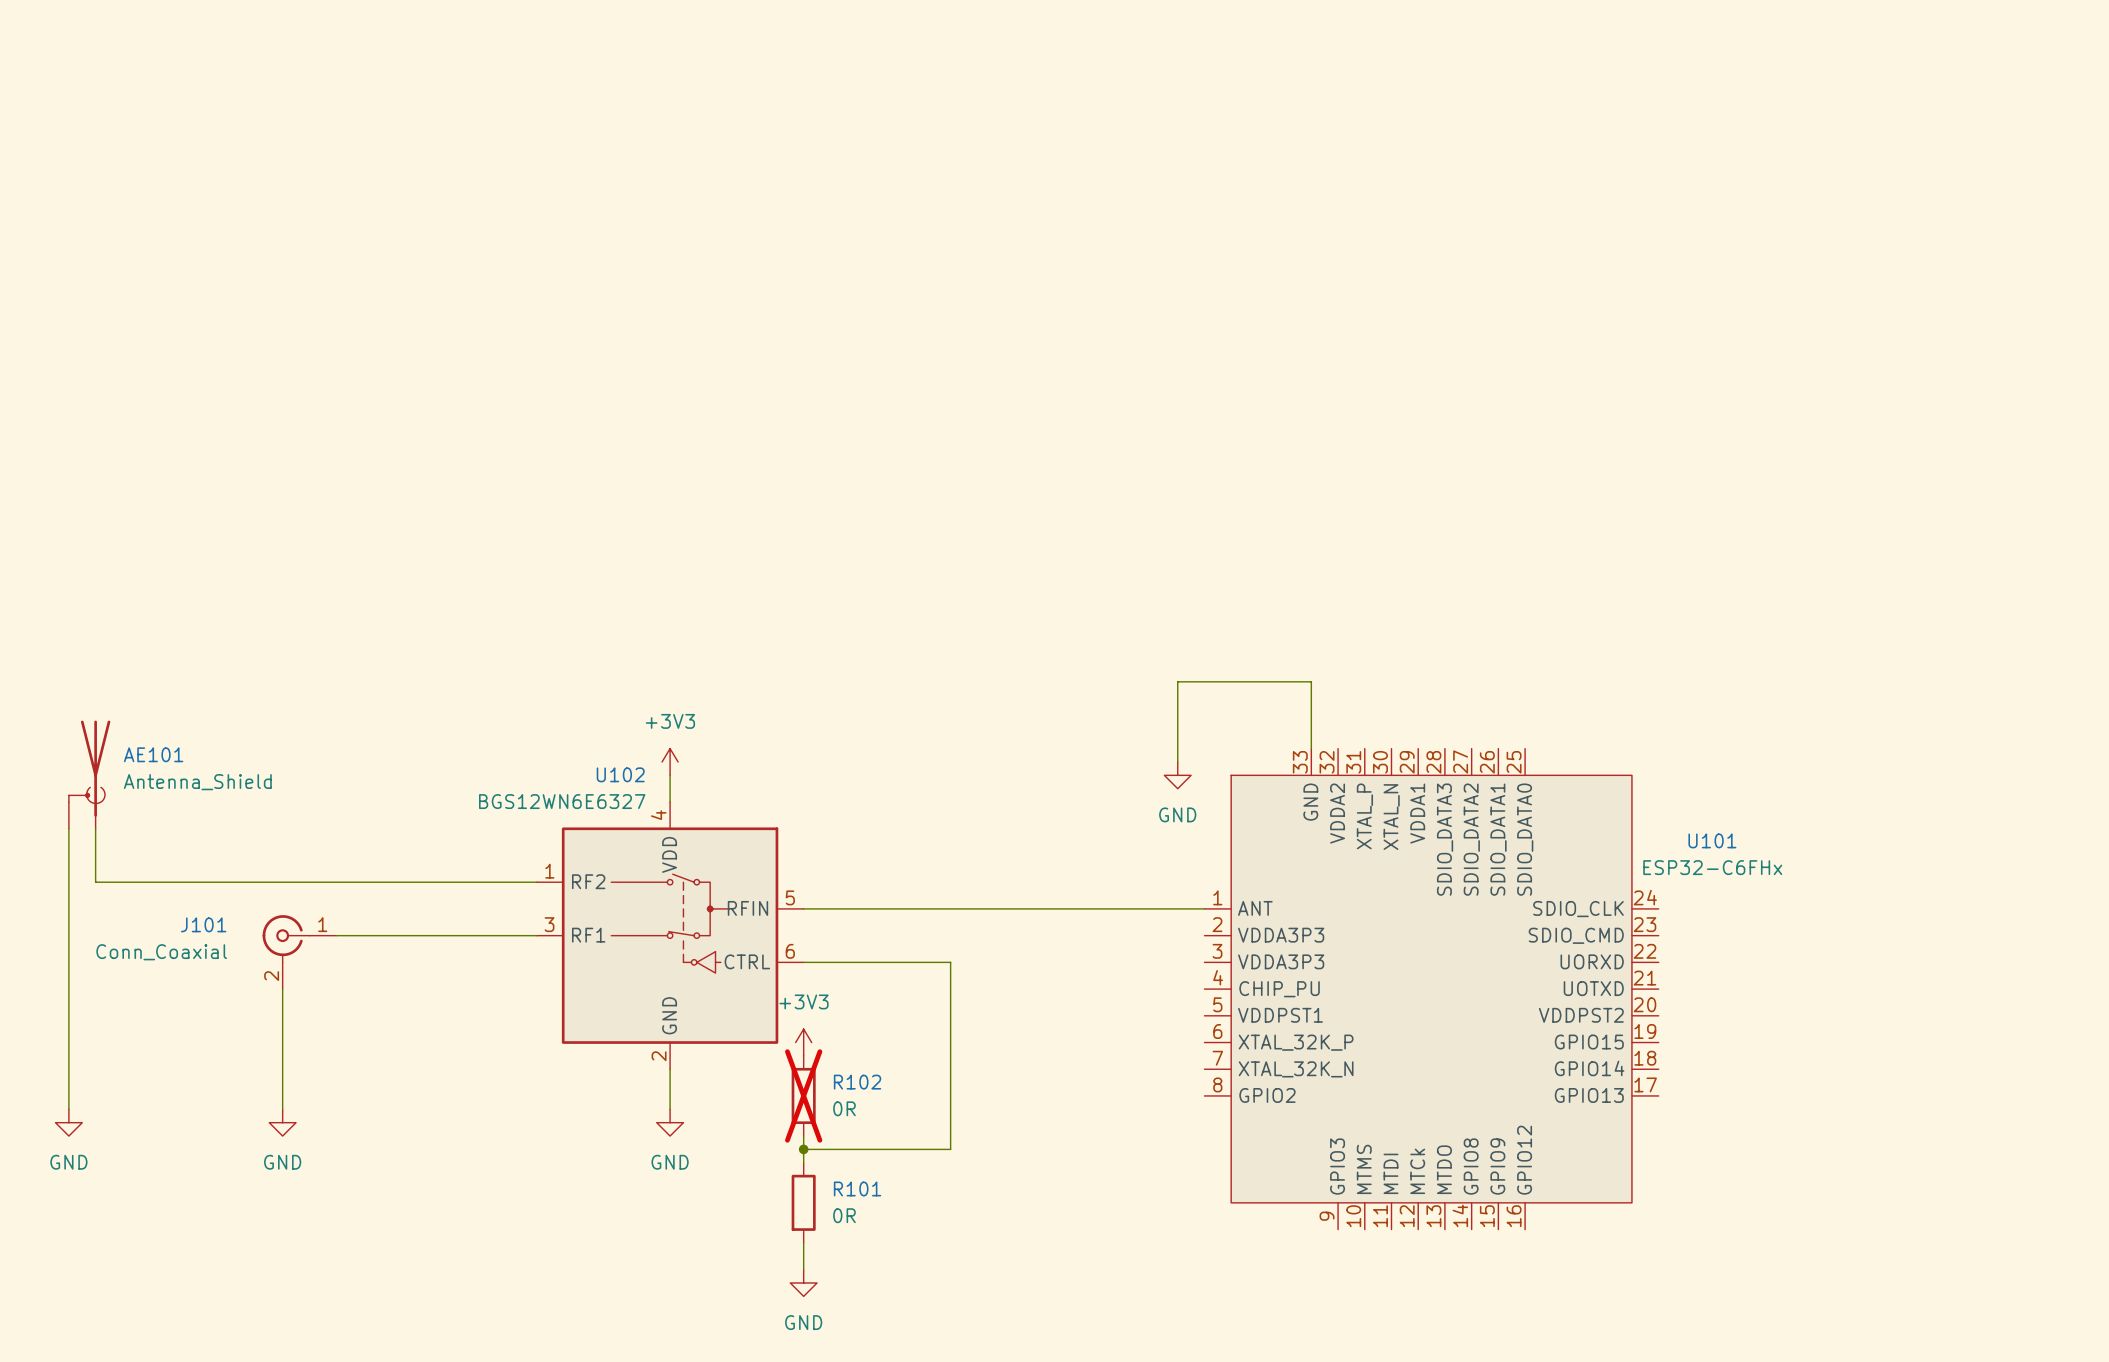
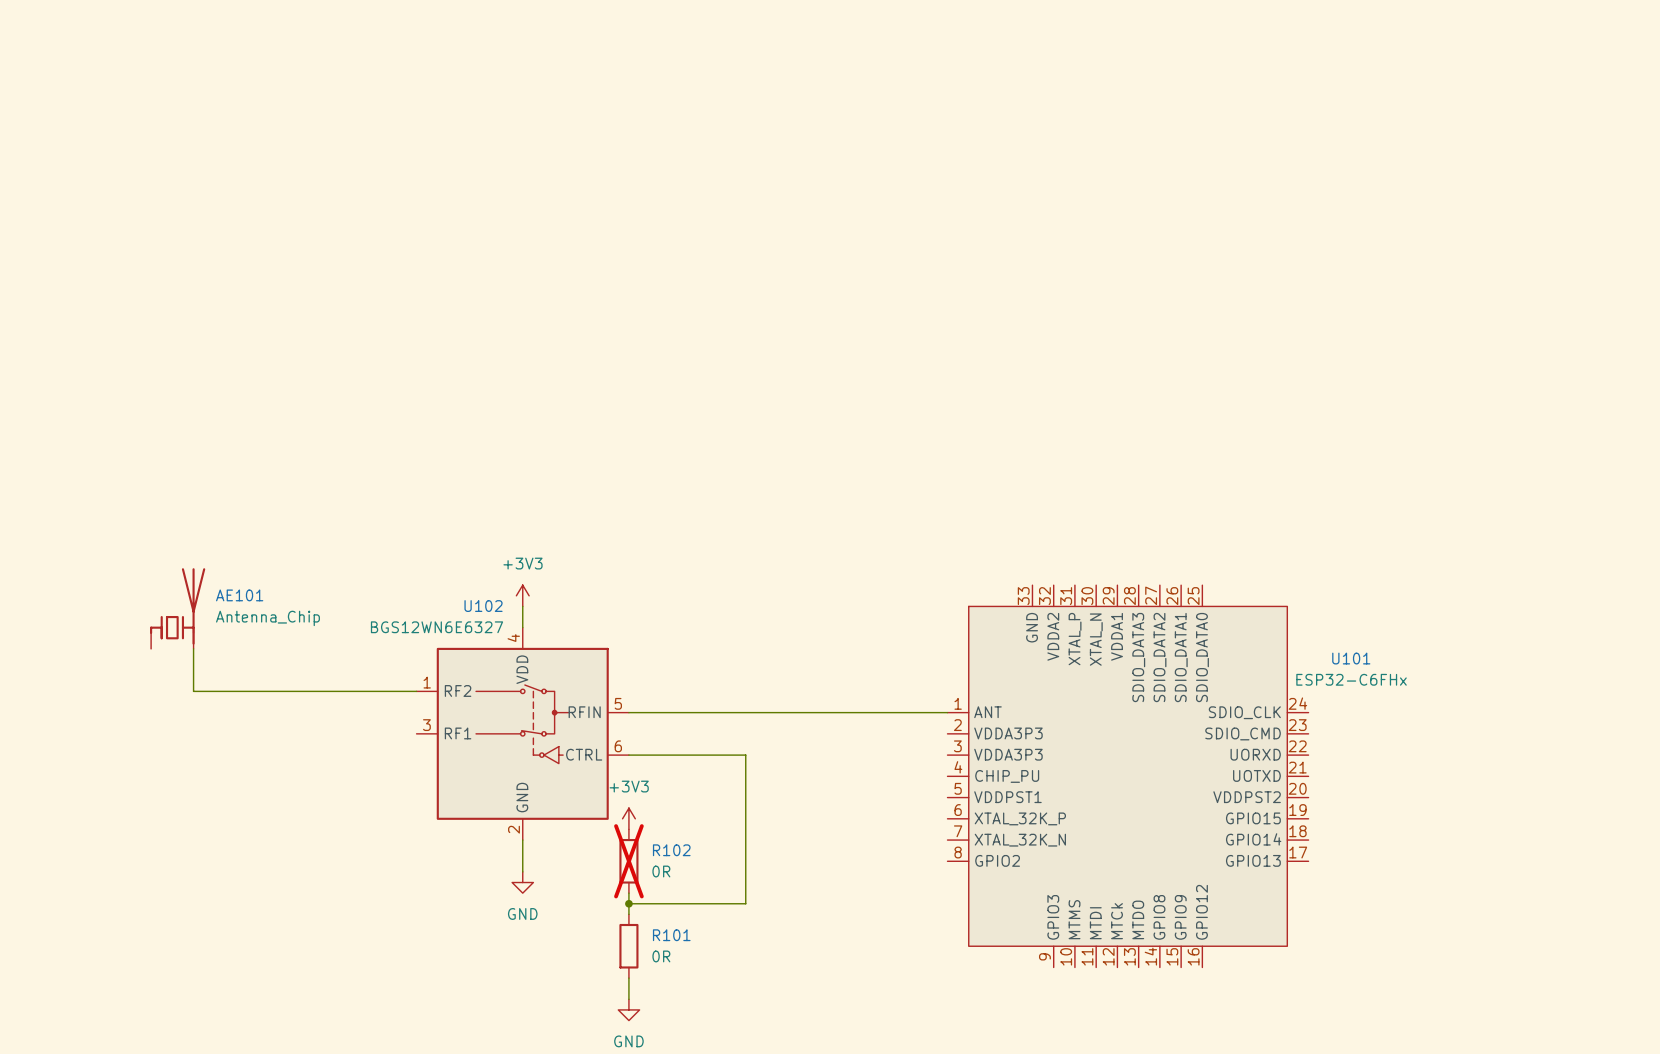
AE101 symbol: [68, 720, 111, 829] -> [150, 568, 206, 649]
wire: (1311, 748) (1311, 681) (1177, 681) (1177, 761) -> none
power symbol: GND (1177, 775) -> none
AE101 value: Antenna_Shield (197, 782) -> Antenna_Chip (267, 618)
wire: (68, 828) (68, 1109) -> none
wire: (95, 828) (95, 882) (255, 882) -> (193, 648) (193, 691)
wire: (336, 935) (536, 935) -> none
J101: Conn_Coaxial (299, 952) -> none
wire: (282, 989) (282, 1109) -> none
power symbol: GND (68, 1122) -> none
power symbol: GND (282, 1122) -> none

